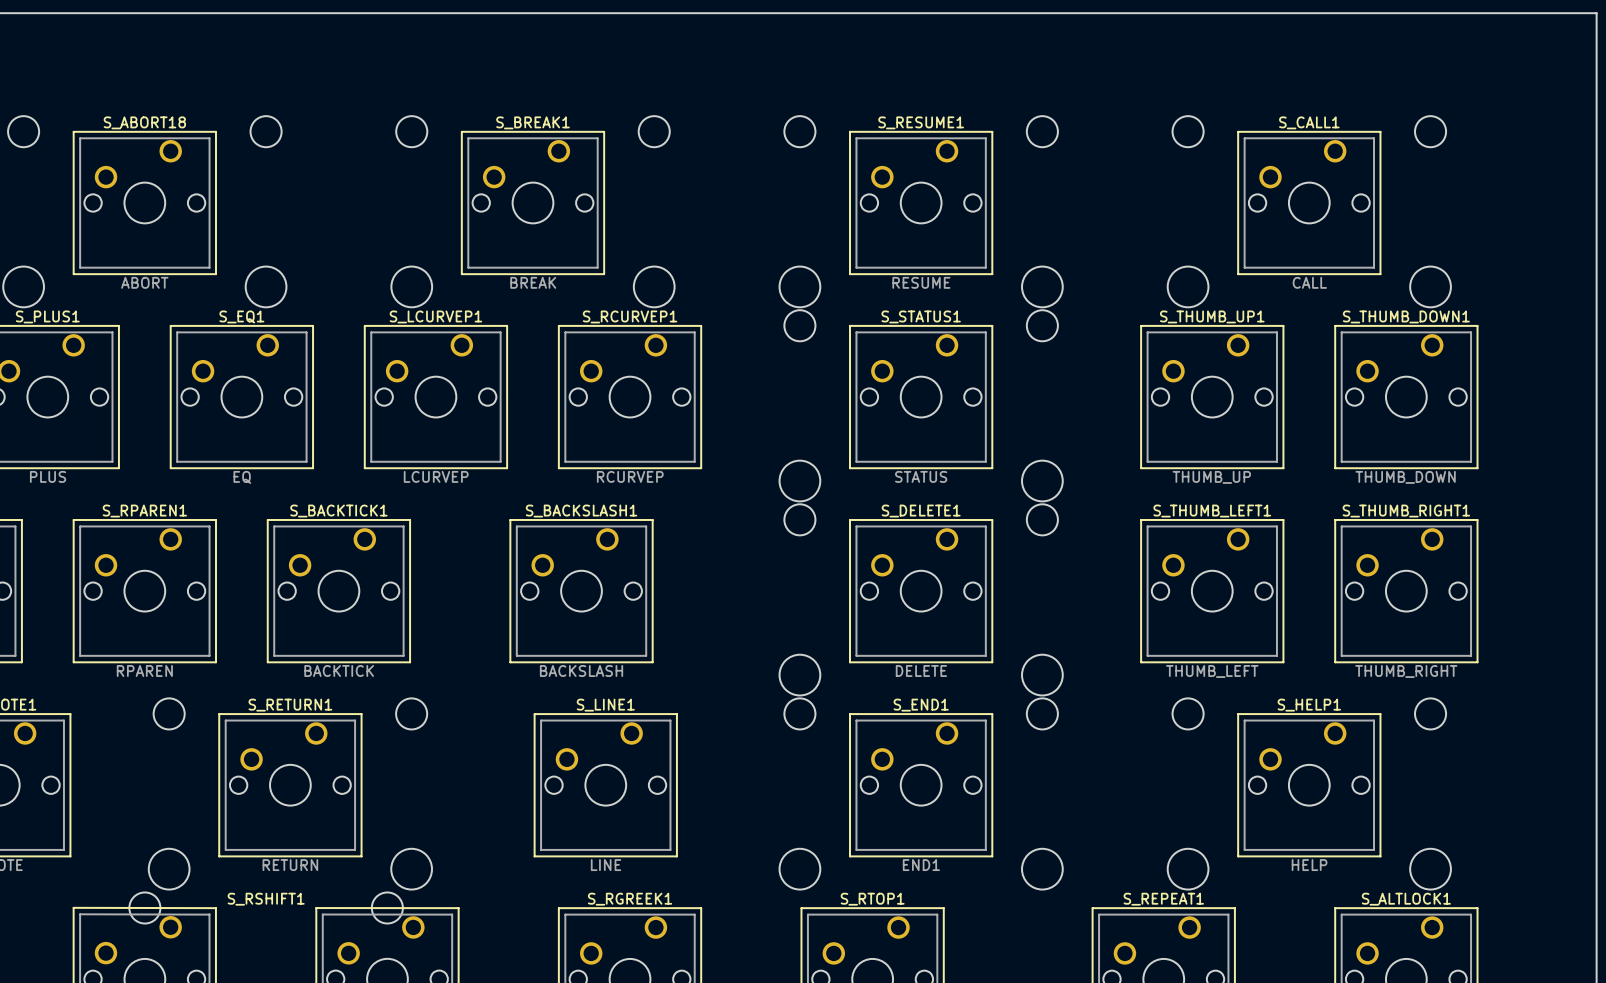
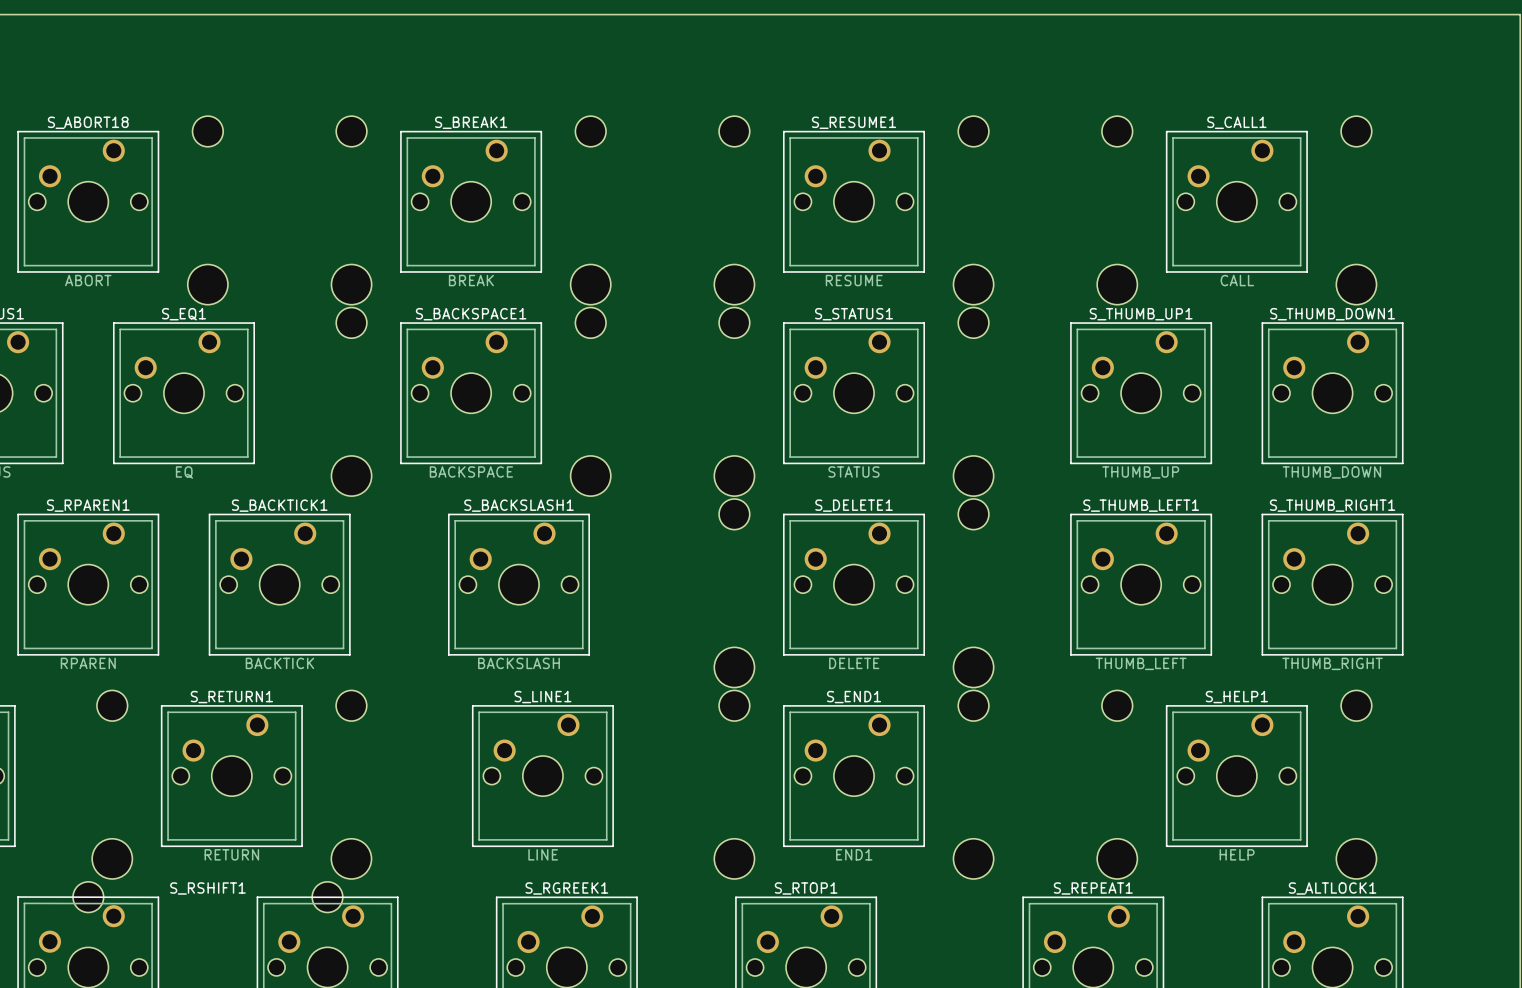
S_LCURVEP1: LCURVEP (435, 397) -> none
S_RCURVEP1: RCURVEP (630, 397) -> none
S_BACKSPACE1: none -> BACKSPACE (471, 401)

